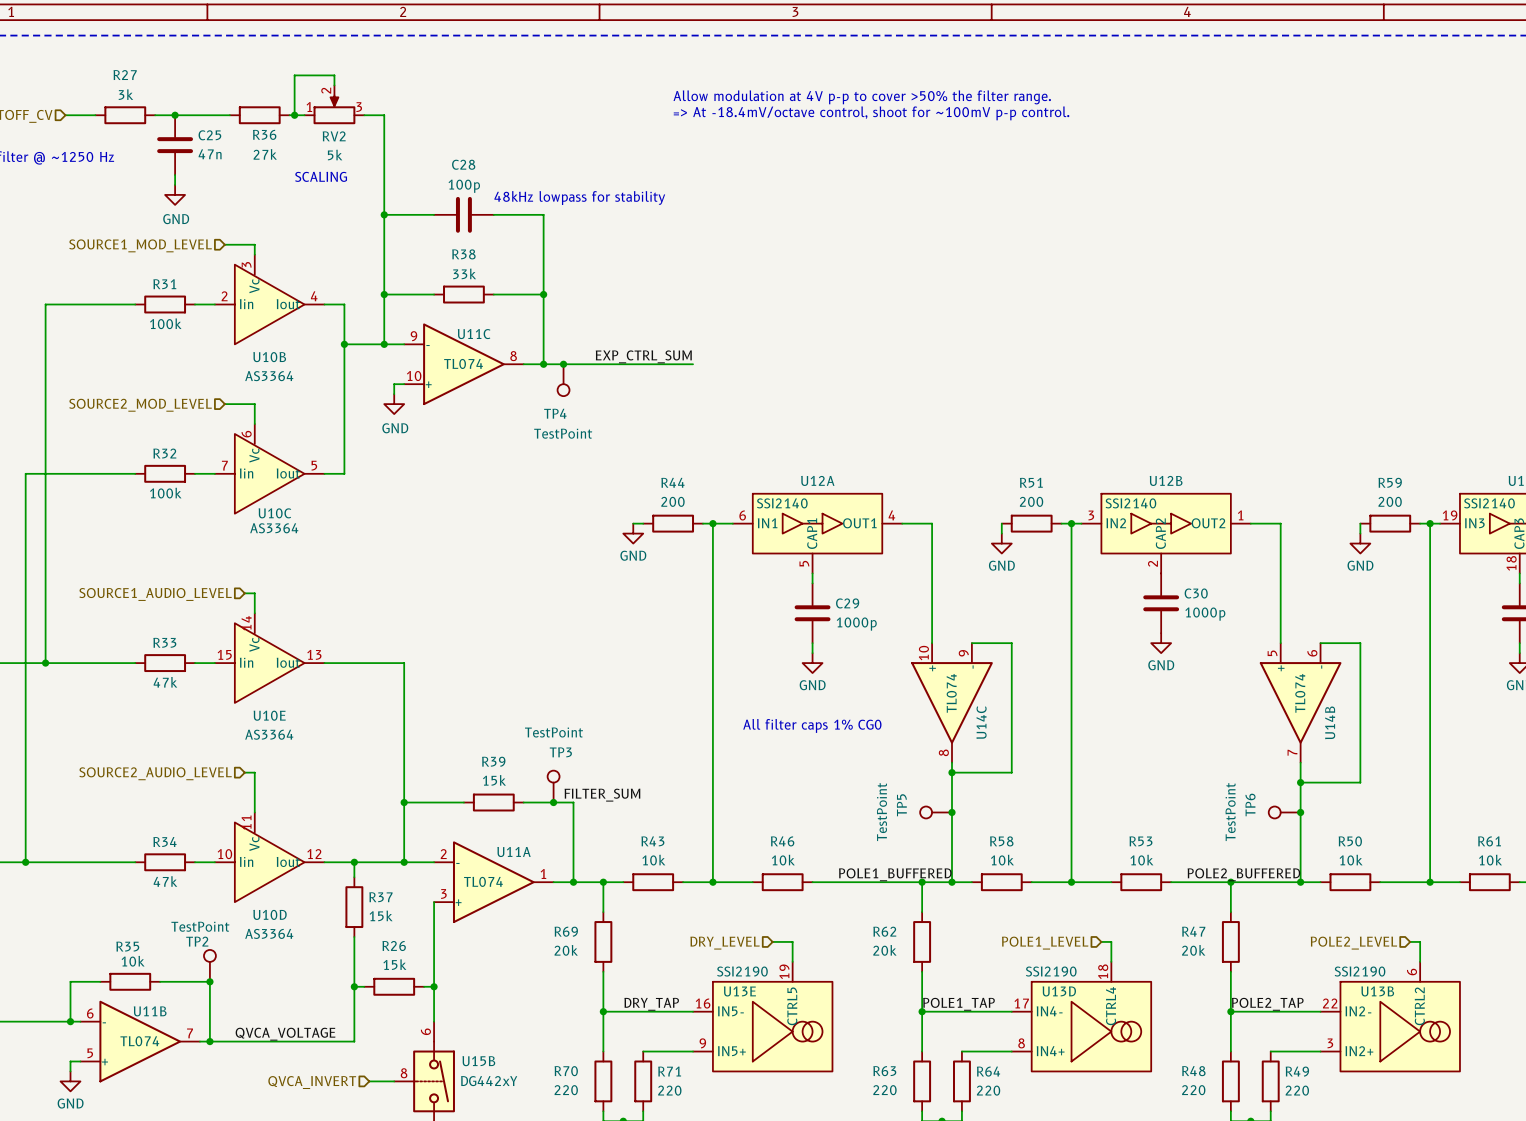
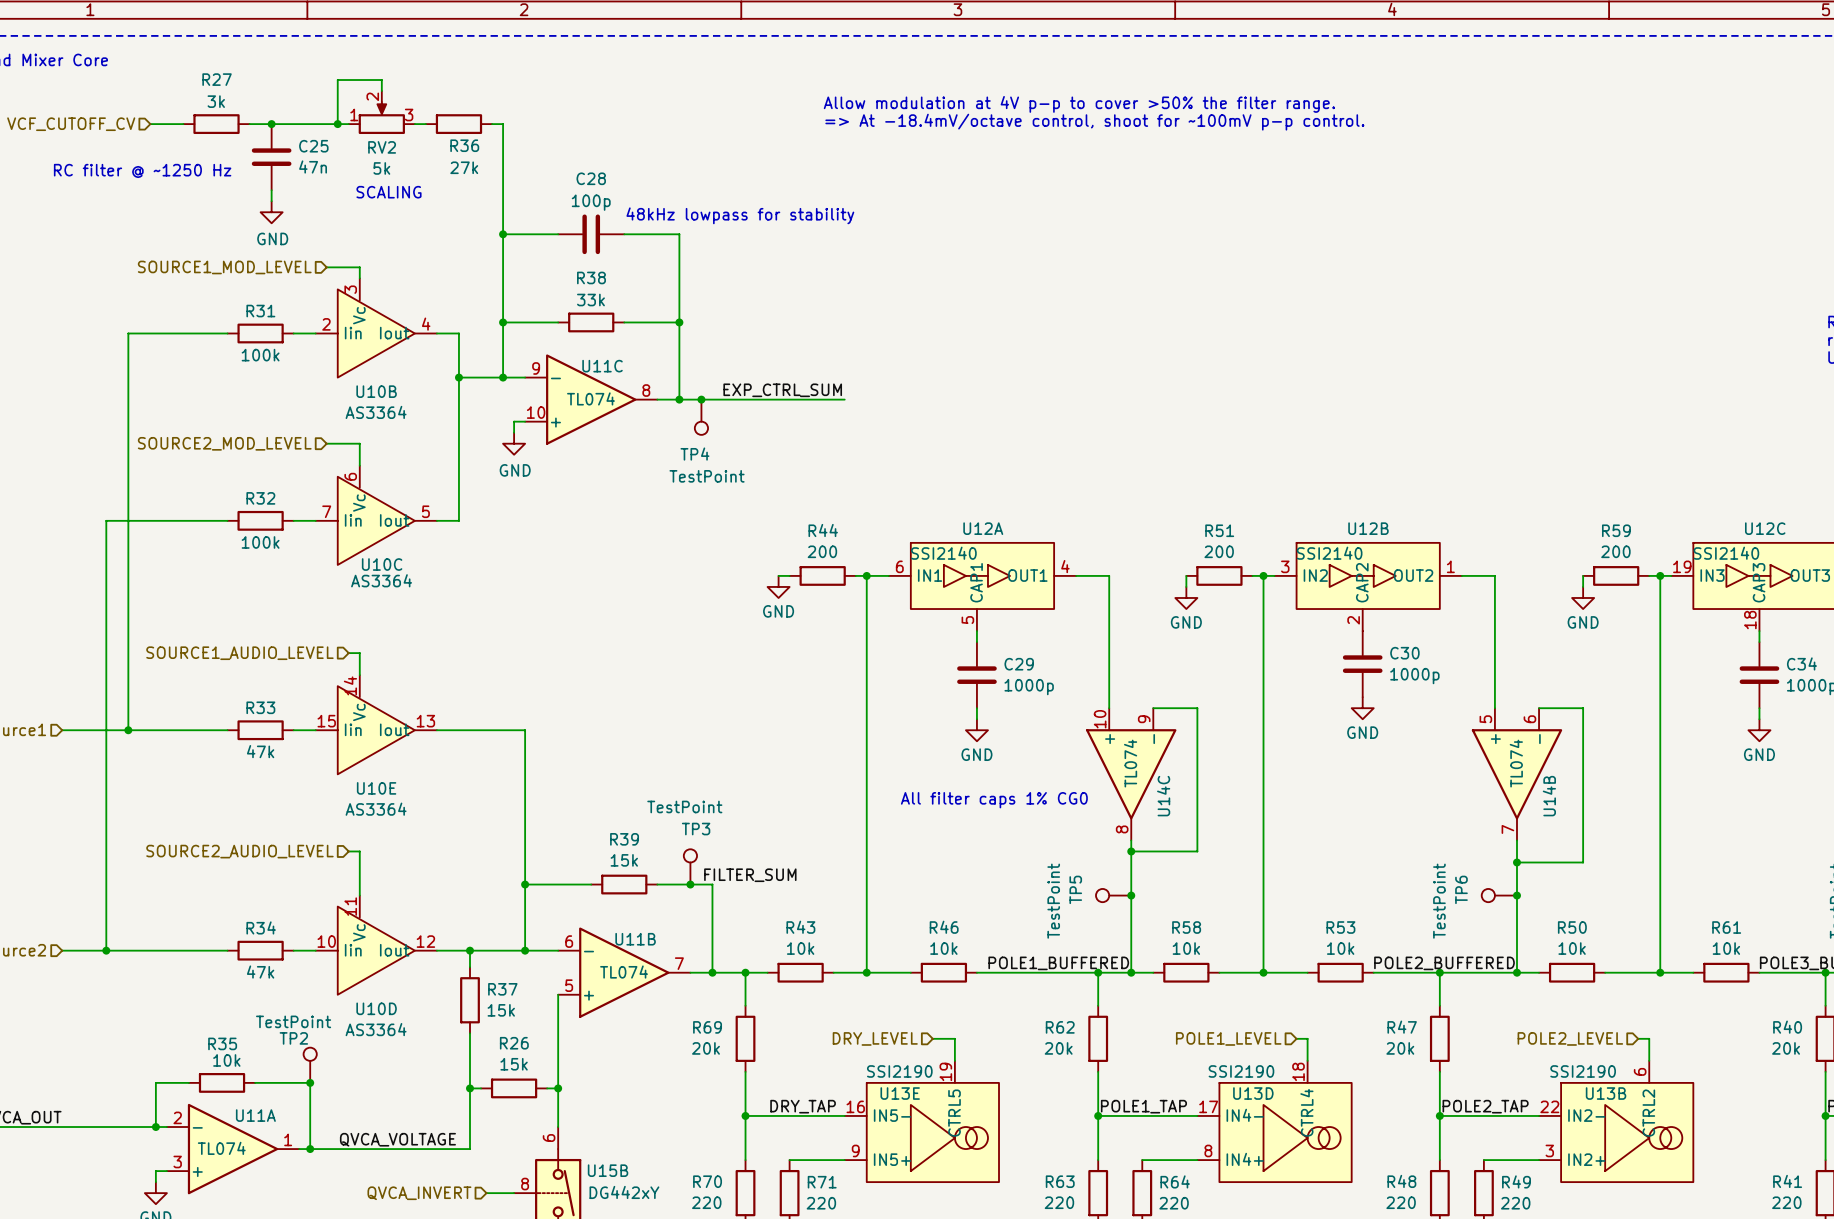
wire: (334, 85) (334, 75) (294, 75) (294, 115) -> (381, 91) (381, 80) (337, 80) (337, 124)
RV2 position: (334, 104) -> (381, 112)
junction: none -> (337, 124)
R36 position: (259, 115) -> (458, 124)
junction: (294, 115) -> none
text position: SCALING (321, 176) -> SCALING (389, 192)
U11A position: (493, 882) -> (233, 1149)
U11B position: (140, 1041) -> (624, 972)

